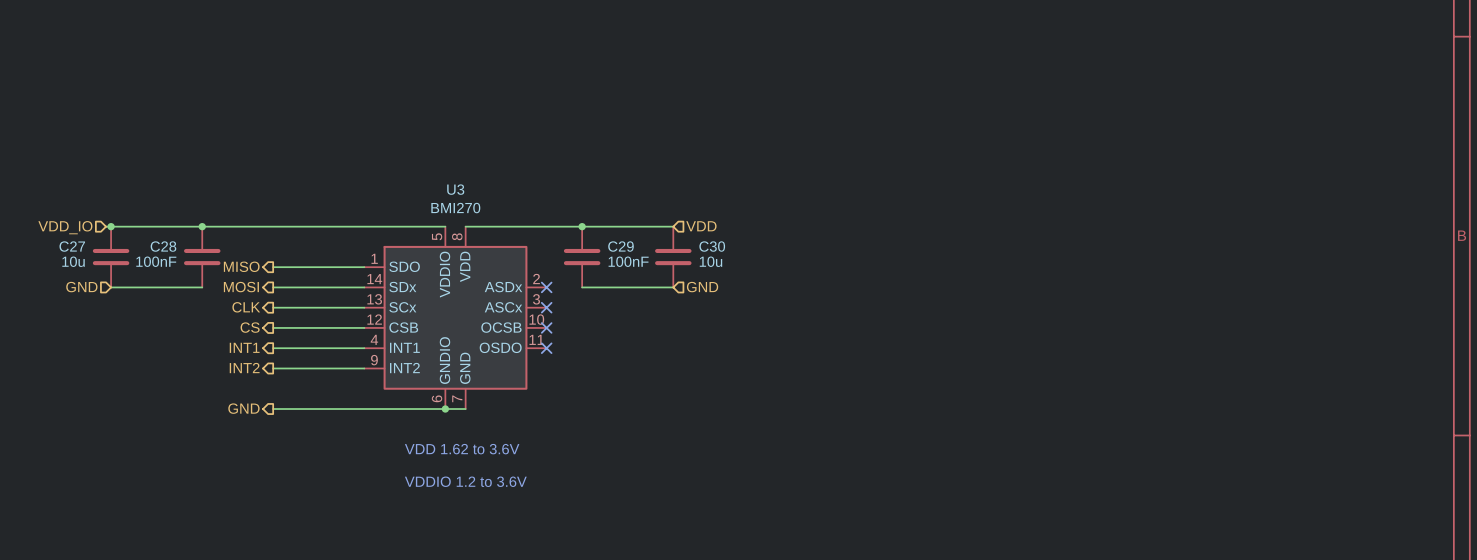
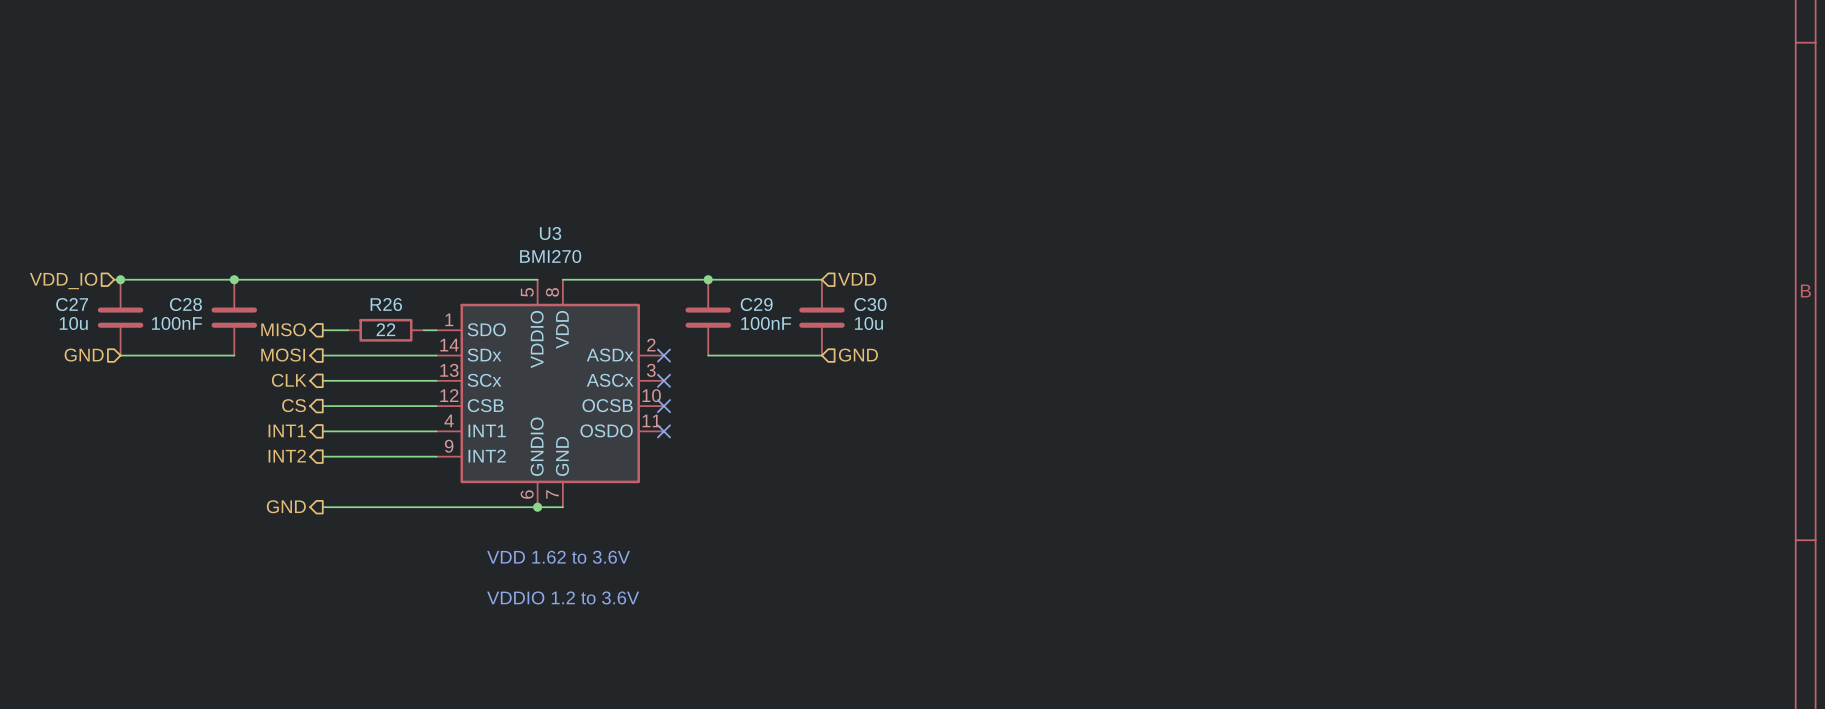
wire: (293, 267) (354, 267) -> none
R26: none -> 22 (385, 330)

